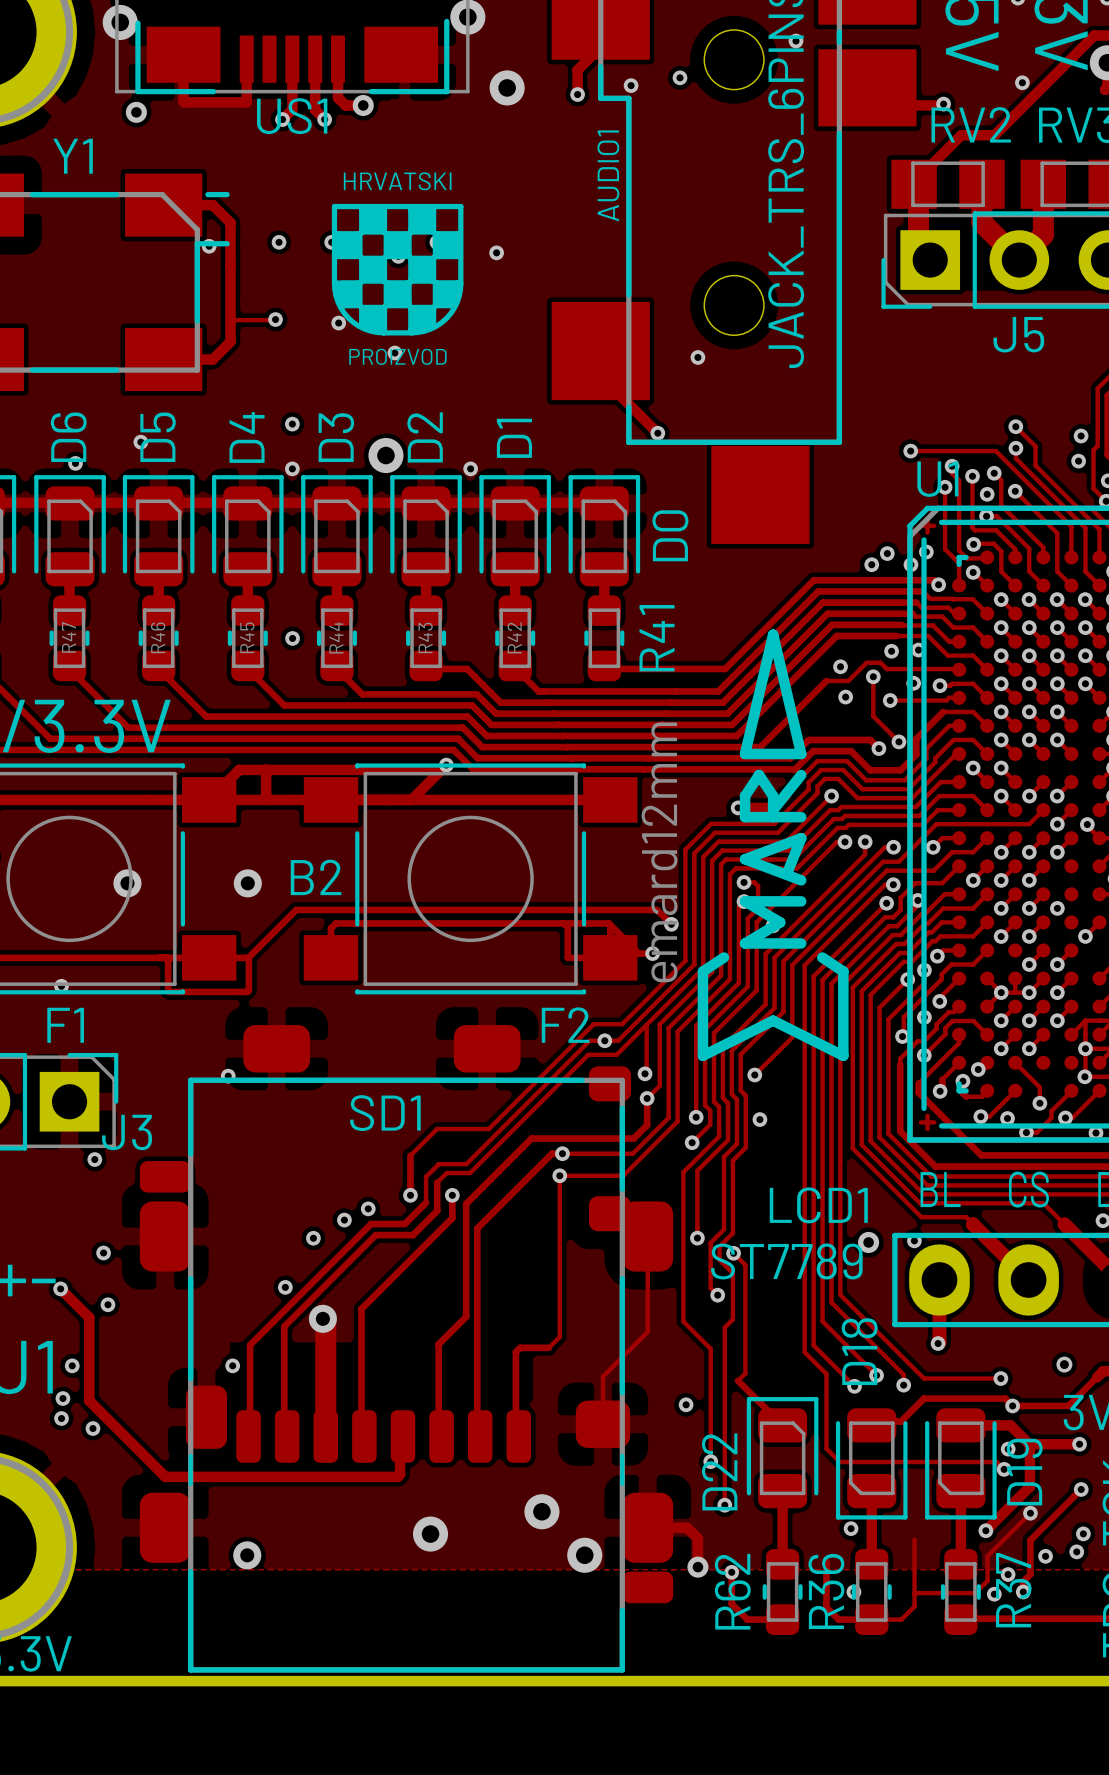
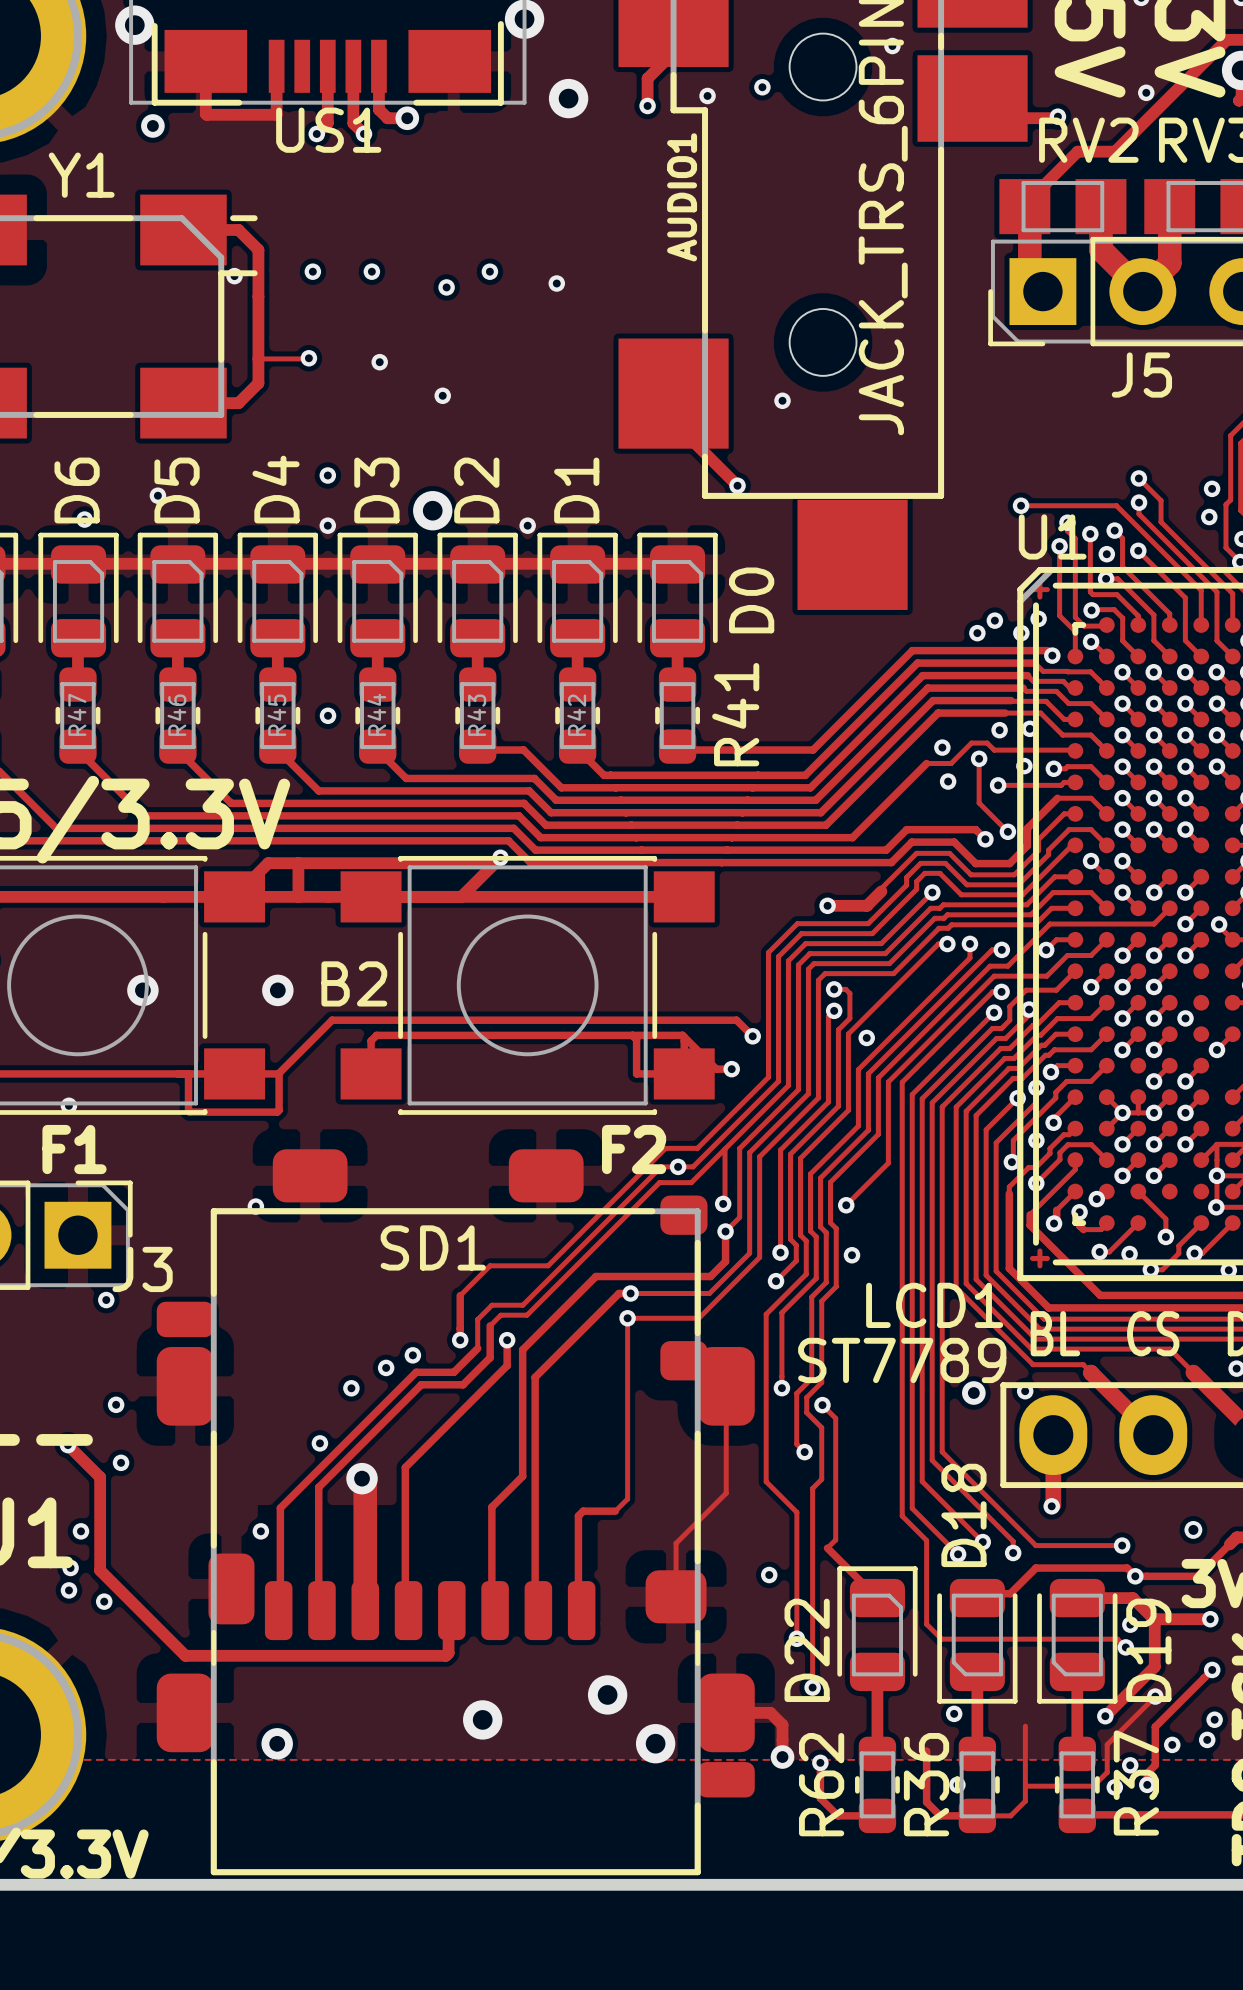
drawing: [331, 203, 464, 336] -> none
drawing: [697, 629, 849, 1062] -> none
LCD1 name position: LCD1 (818, 1205) -> LCD1 (934, 1305)
LCD1 value position: ST7789 (786, 1261) -> ST7789 (902, 1360)

